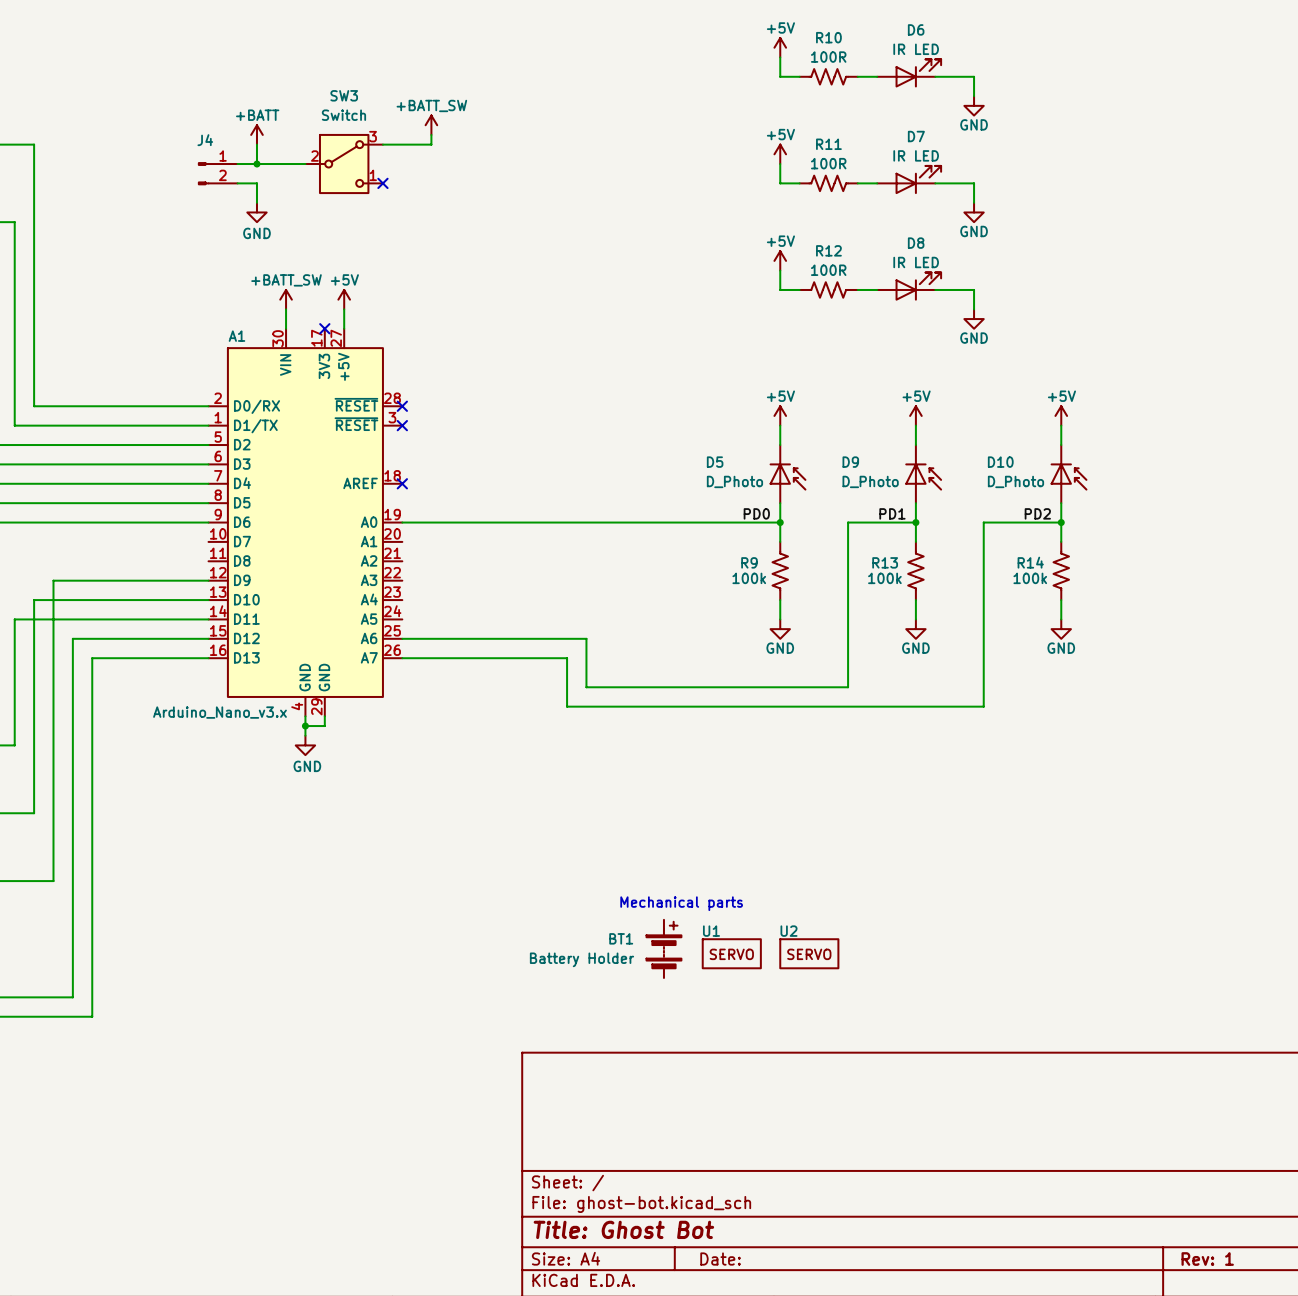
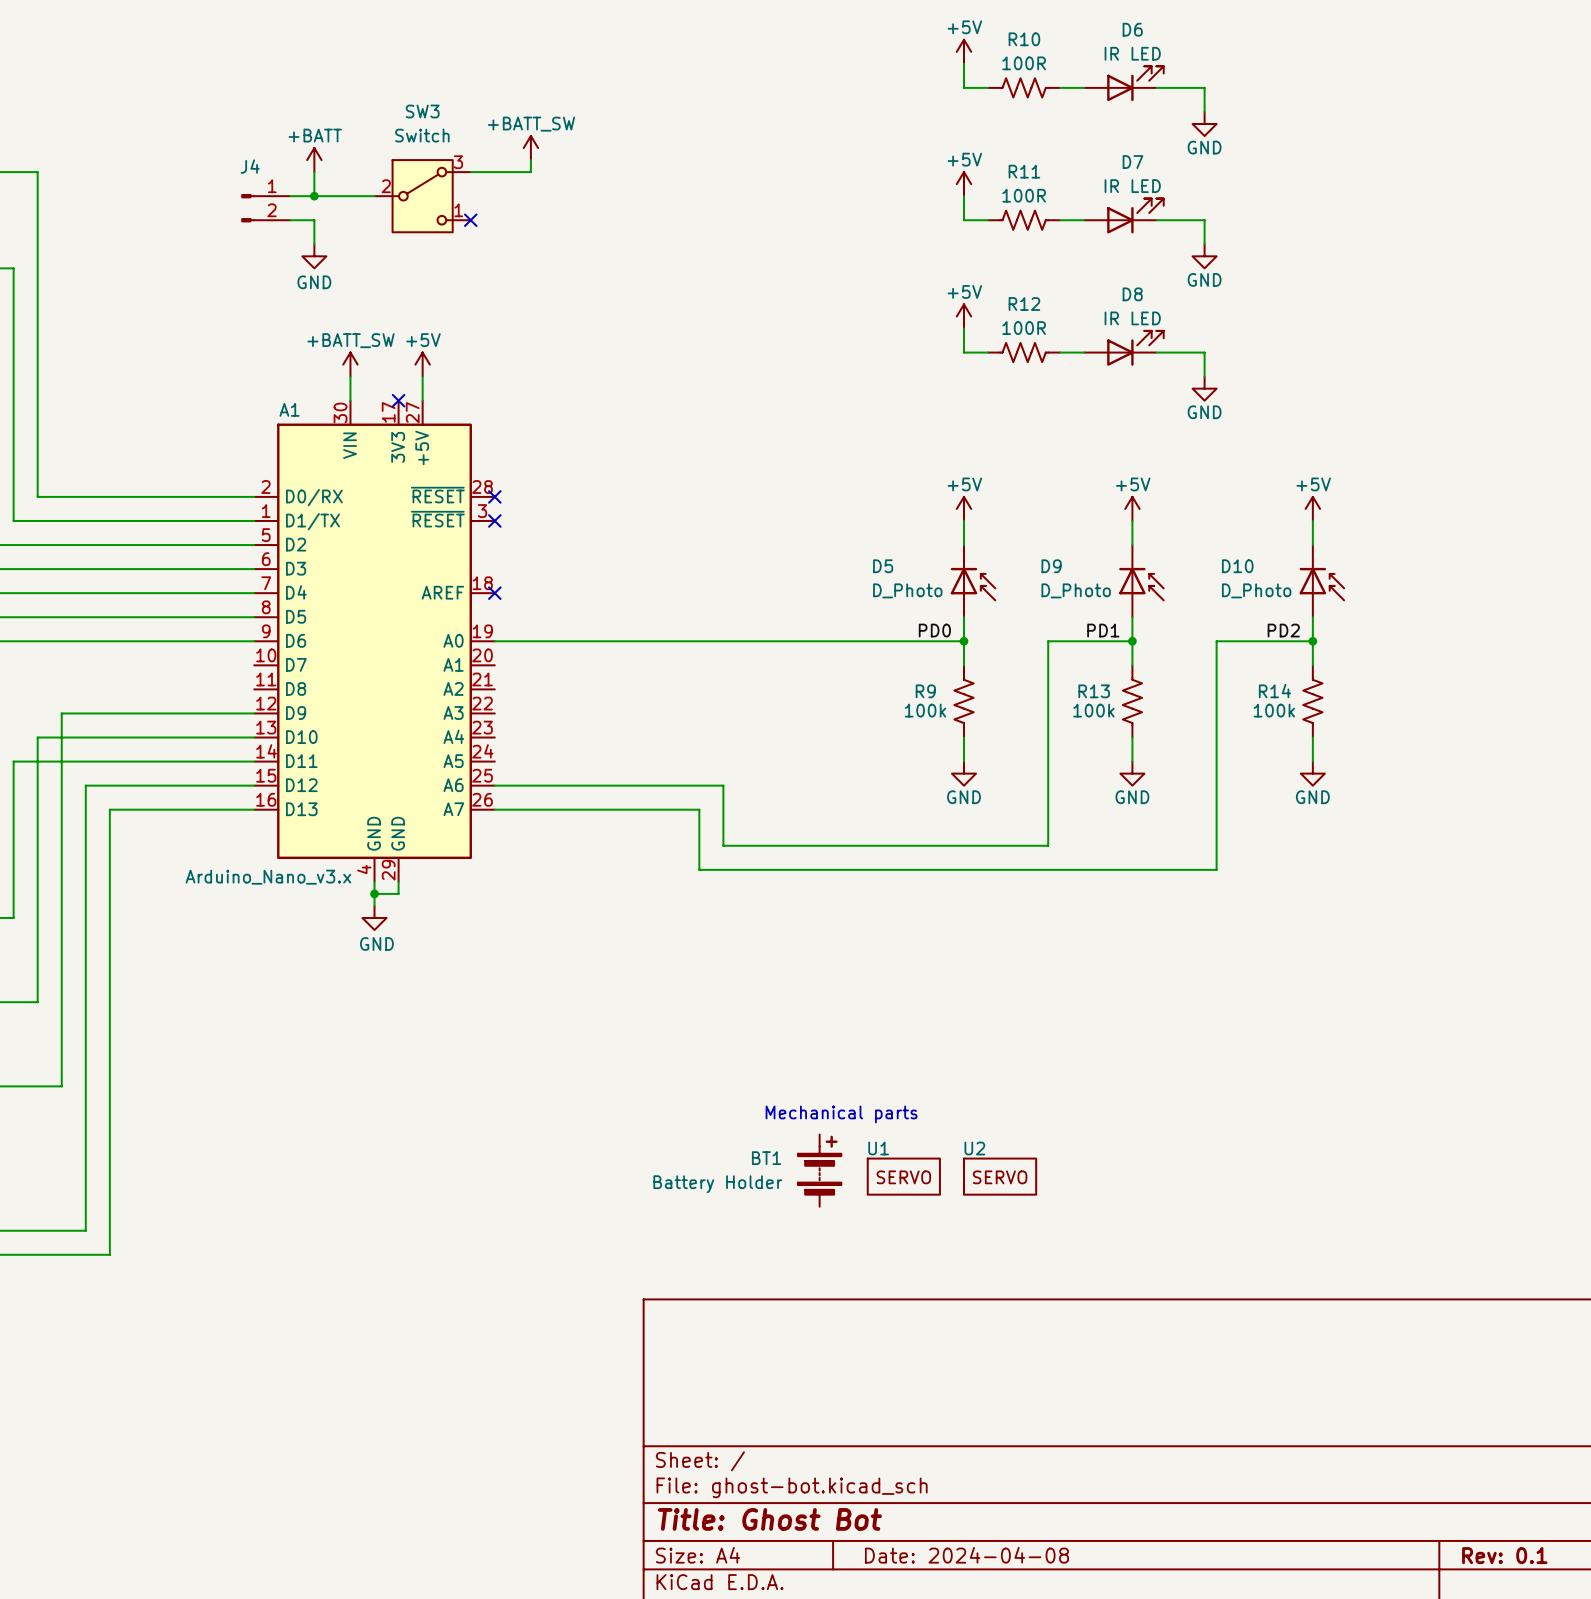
title block: Date: (720, 1259) -> Date: 2024-04-08 (966, 1555)
title block: Rev: 1 (1207, 1259) -> Rev: 0.1 (1504, 1555)

